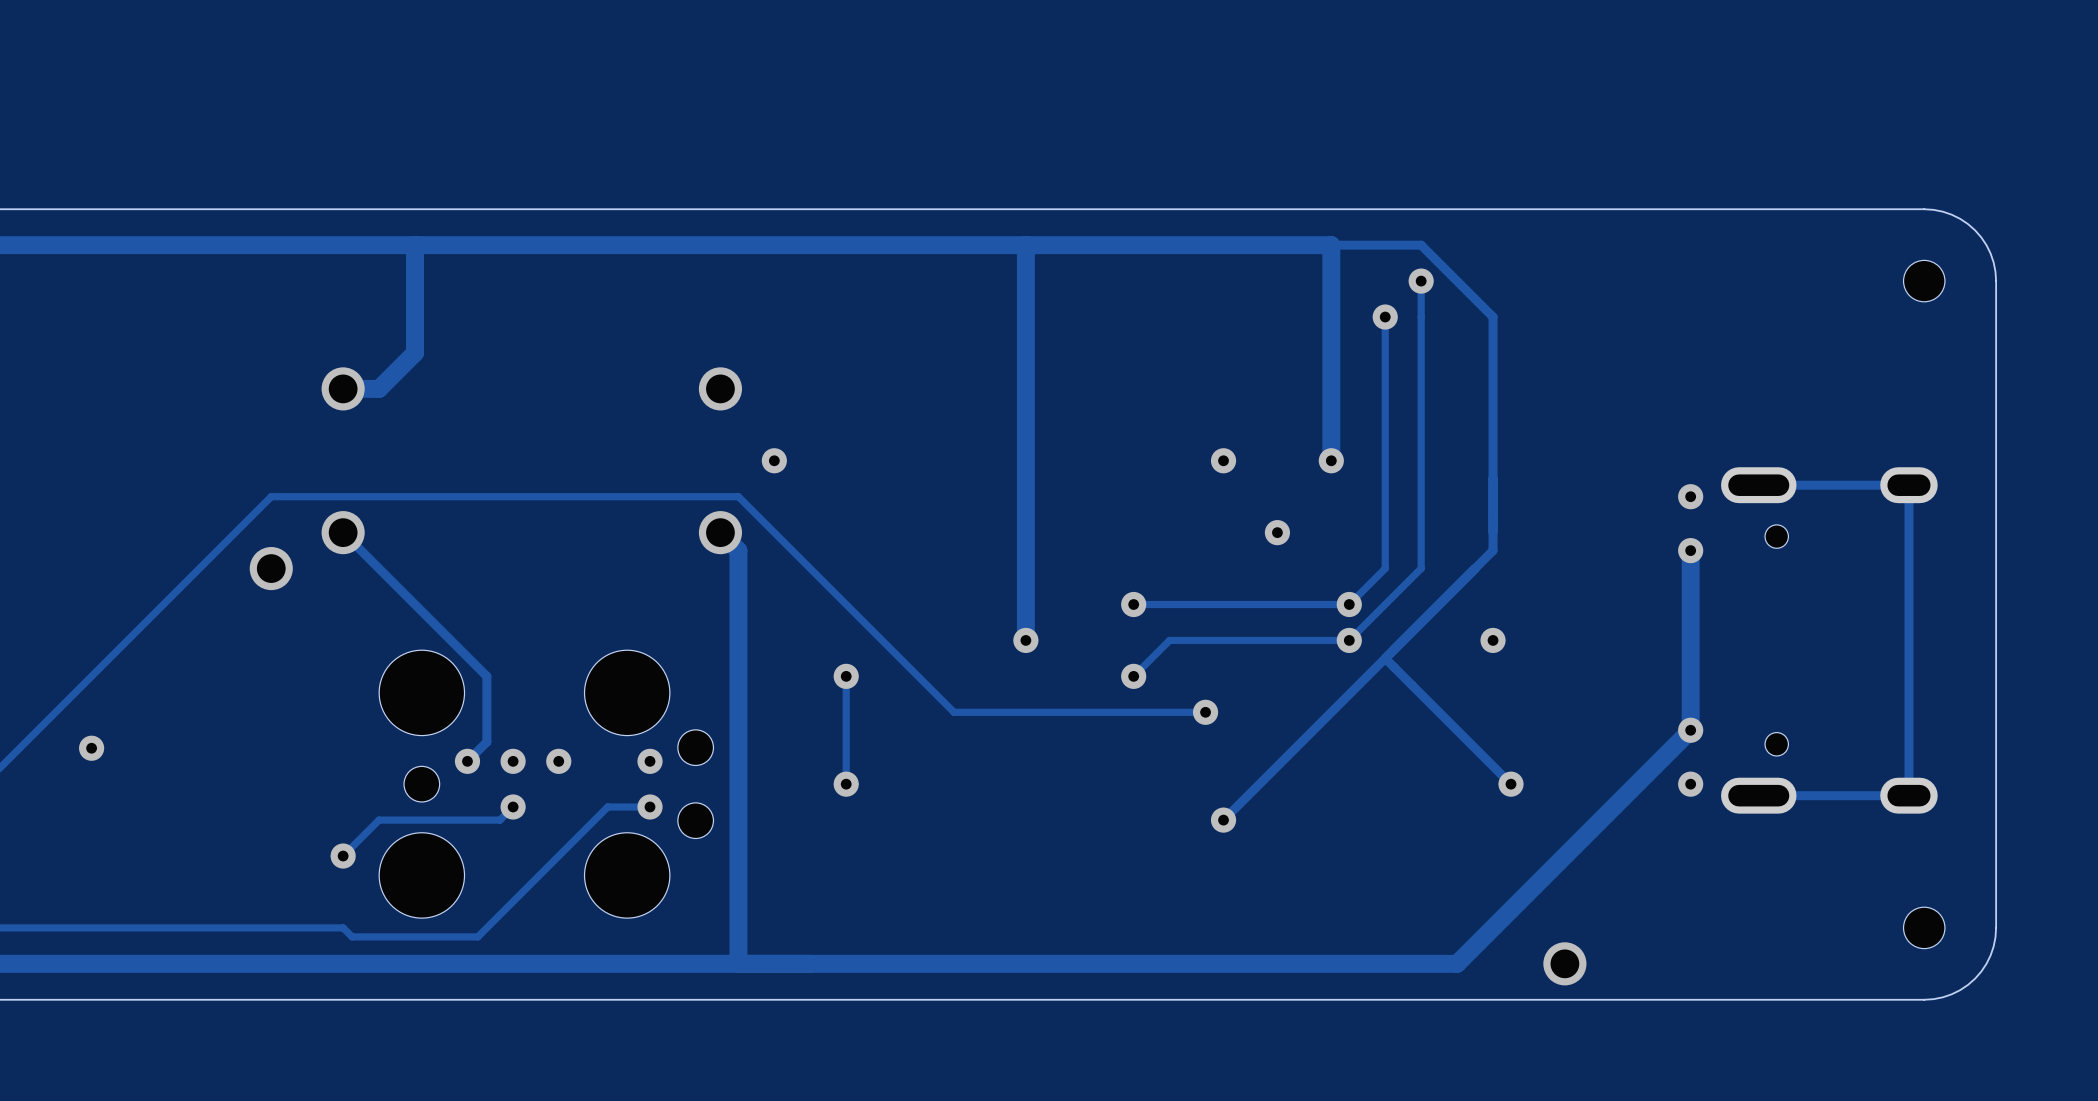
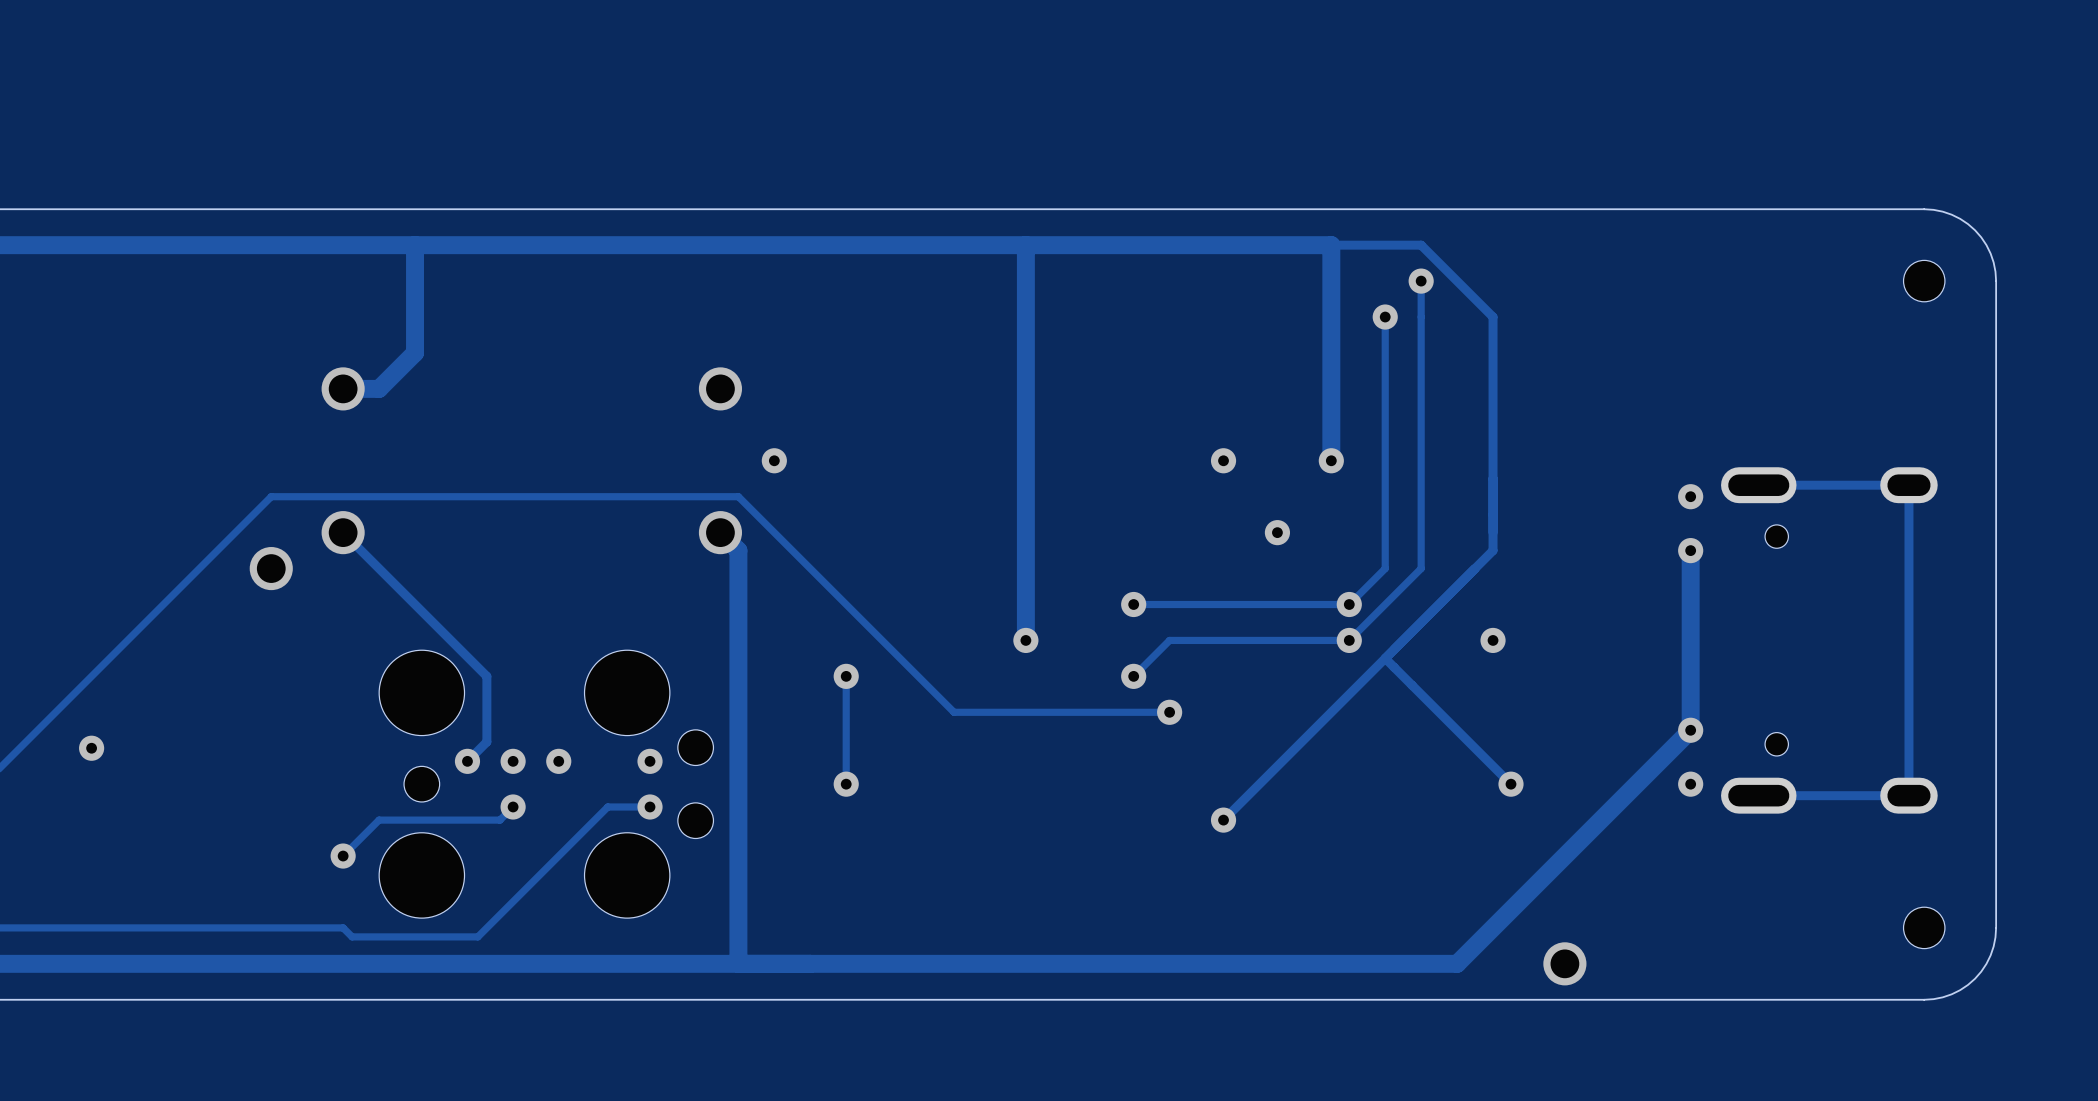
track: (1205, 712) (1169, 712) -> none
via position: (1205, 712) -> (1169, 712)

